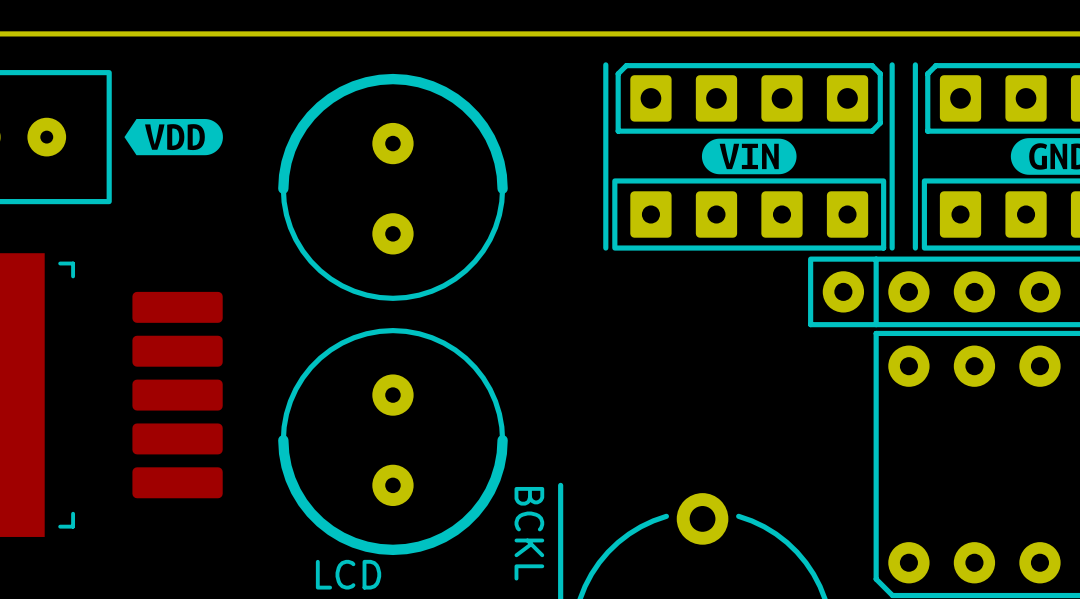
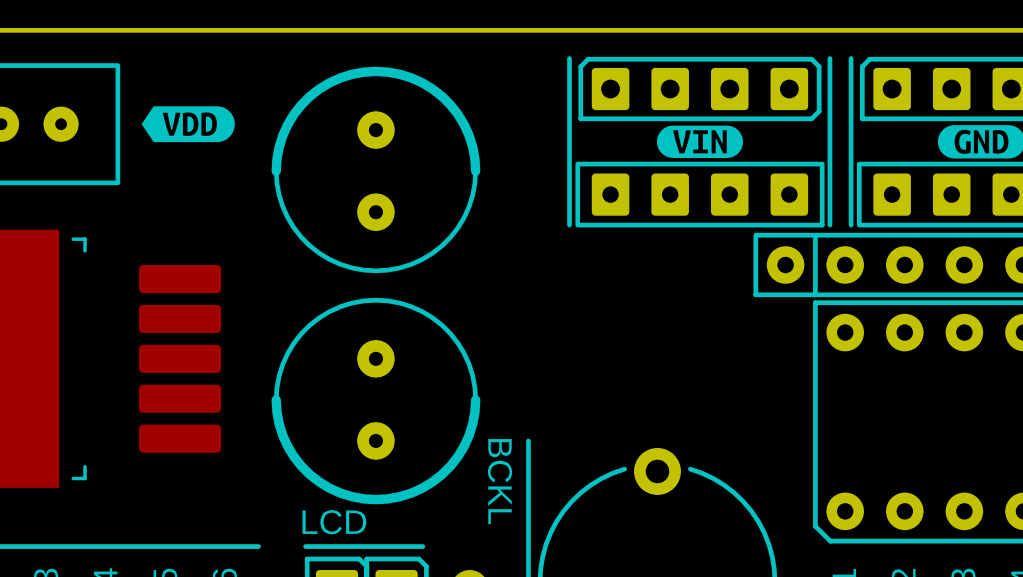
drawing shape: [124, 119, 223, 156] -> [141, 106, 235, 143]

